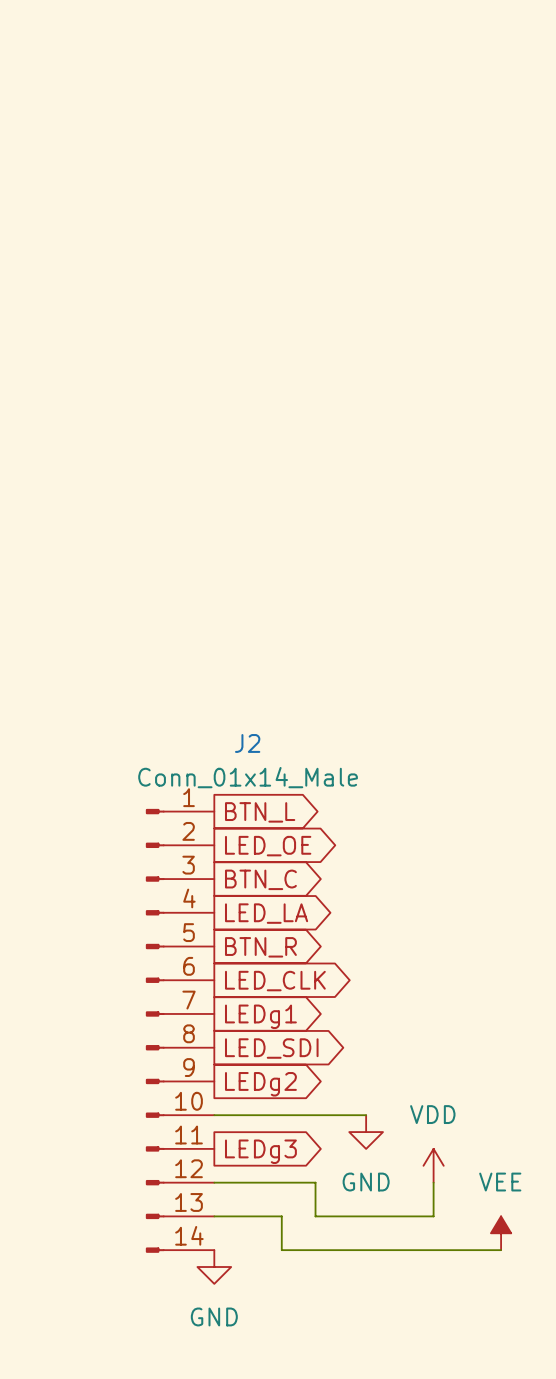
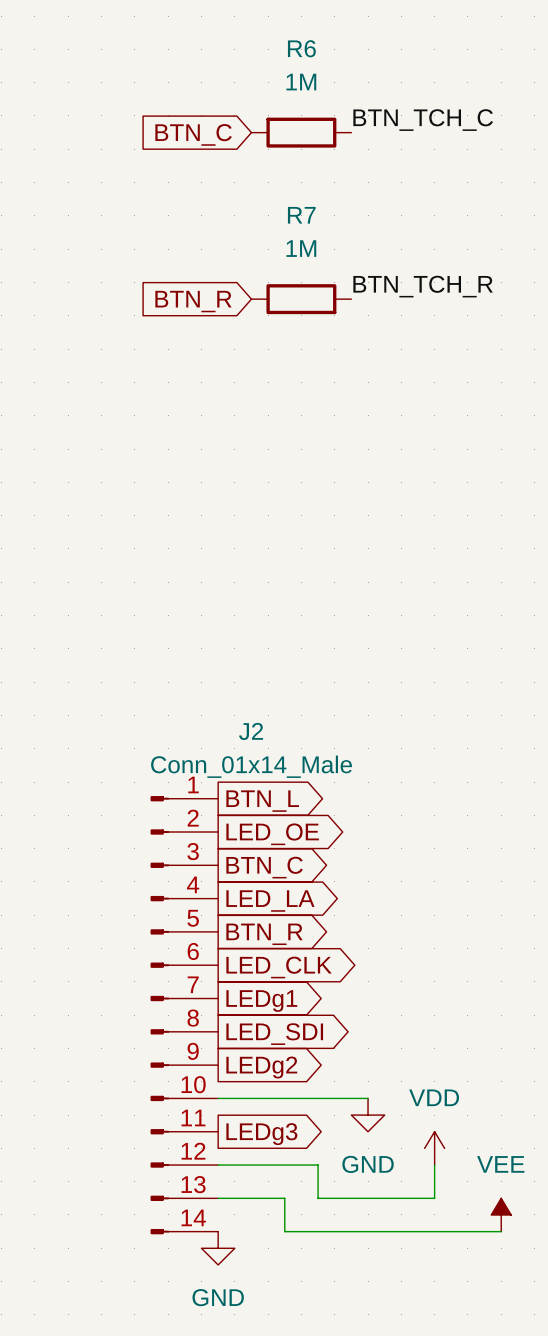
label: none -> BTN_TCH_C (423, 120)
R6: none -> 1M (301, 132)
global label: none -> BTN_C (193, 134)
label: none -> BTN_TCH_R (423, 286)
R7: none -> 1M (301, 299)
global label: none -> BTN_R (193, 301)

